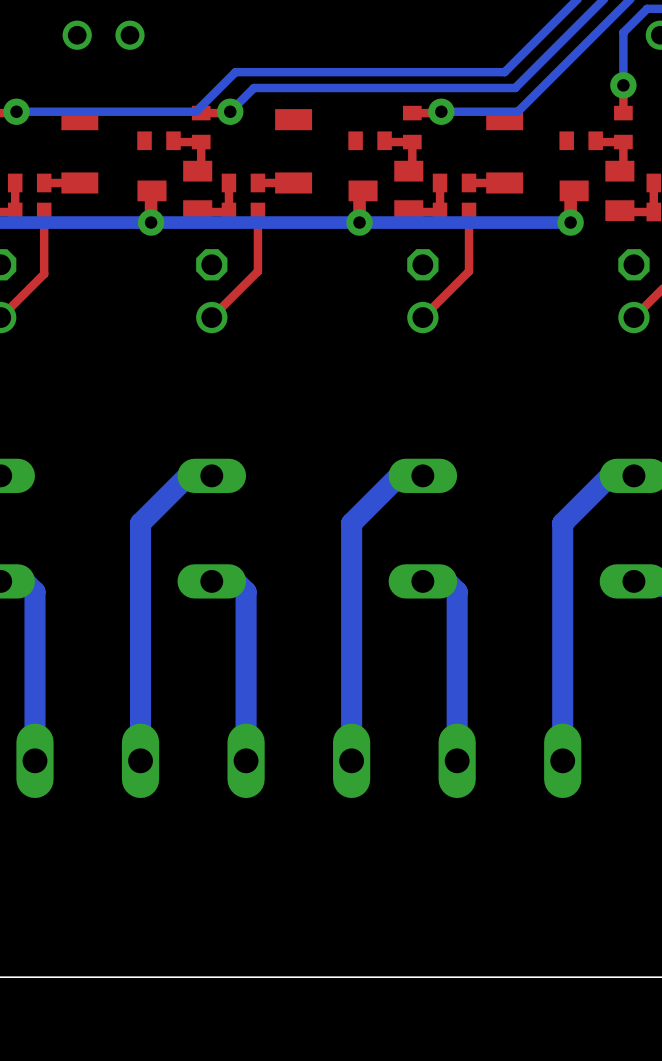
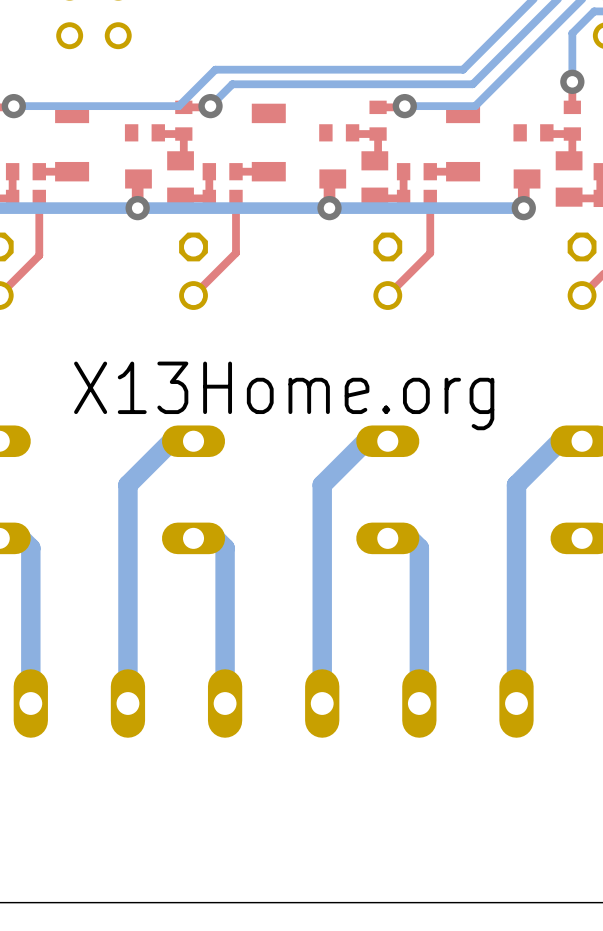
text: none -> X13Home.org (284, 395)

